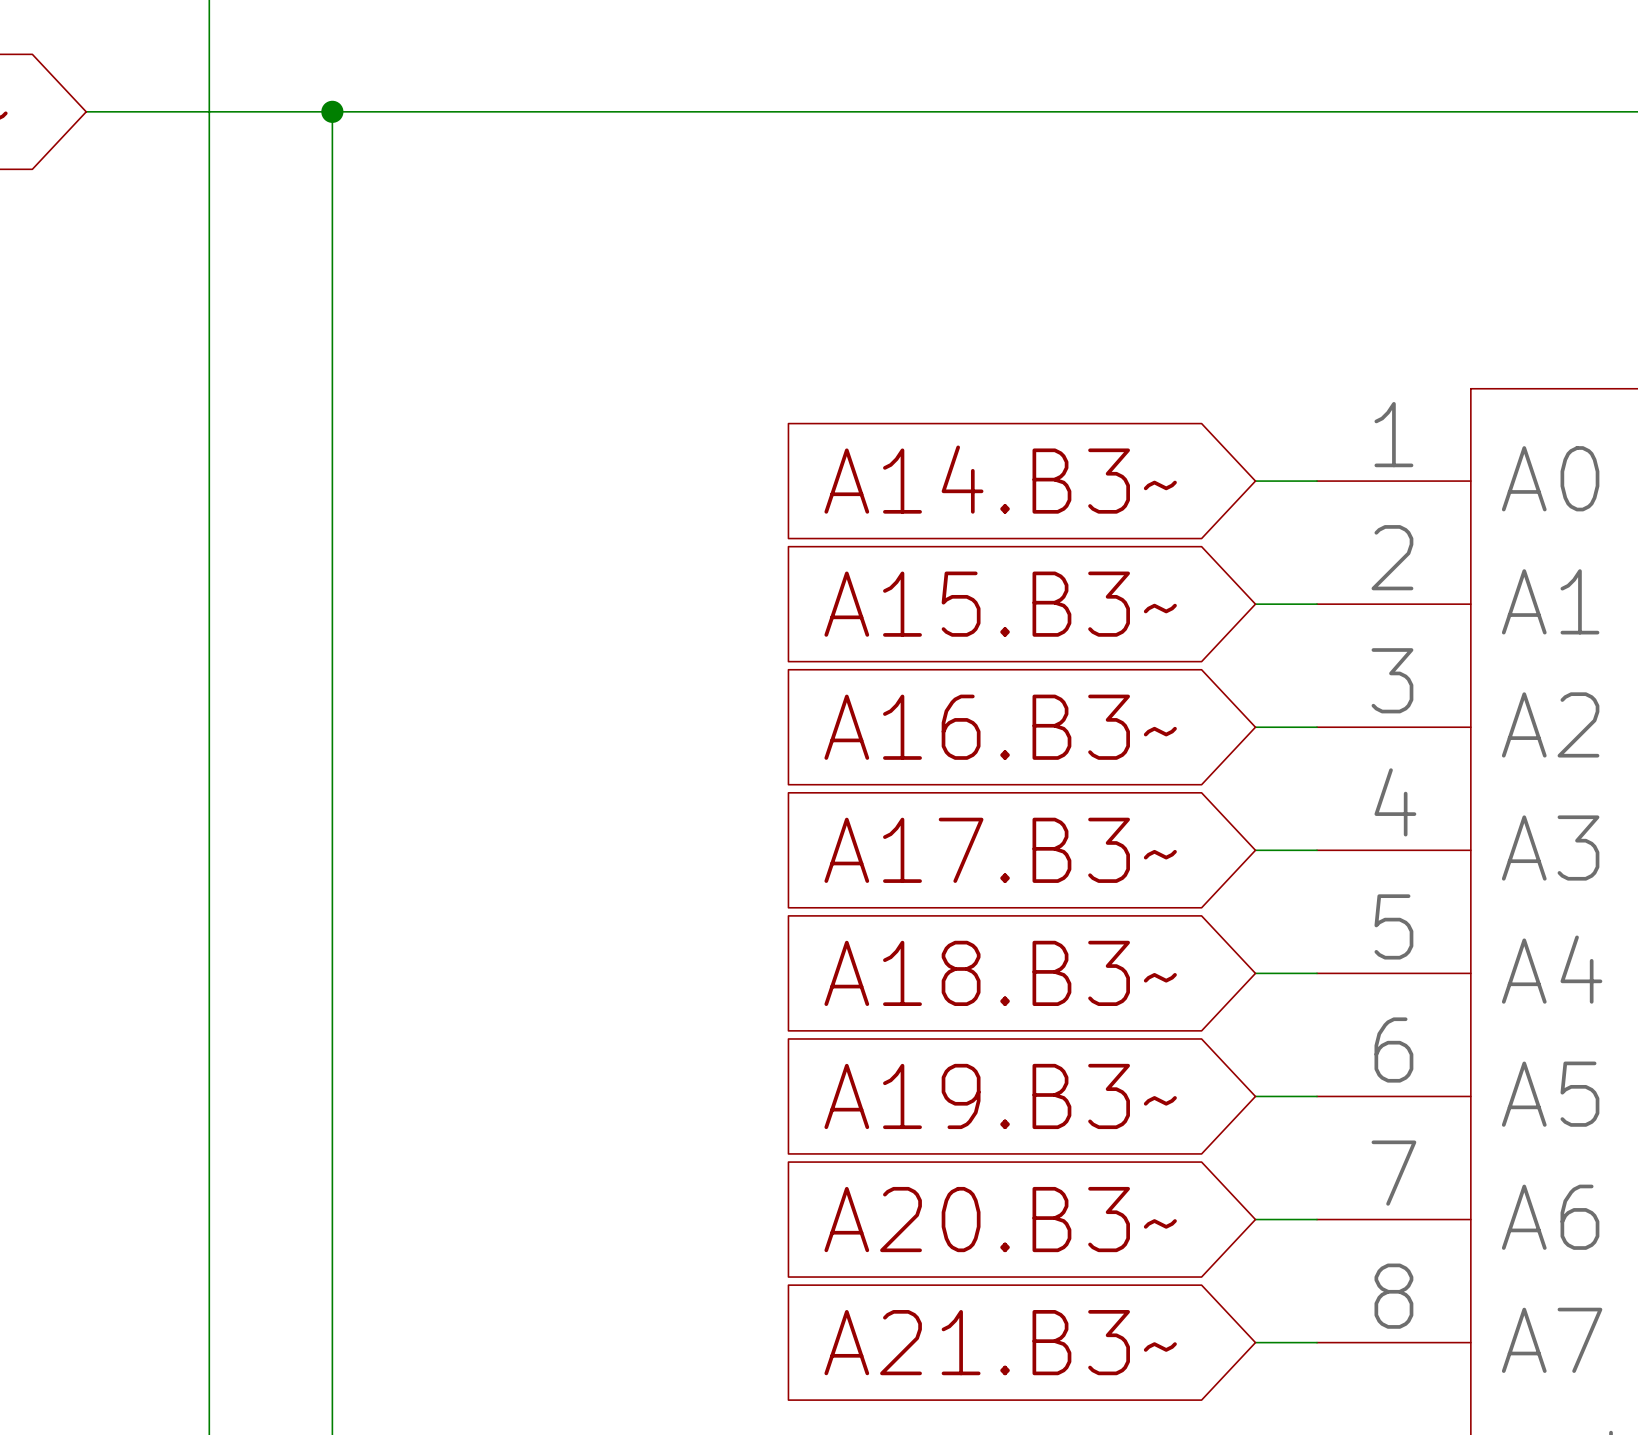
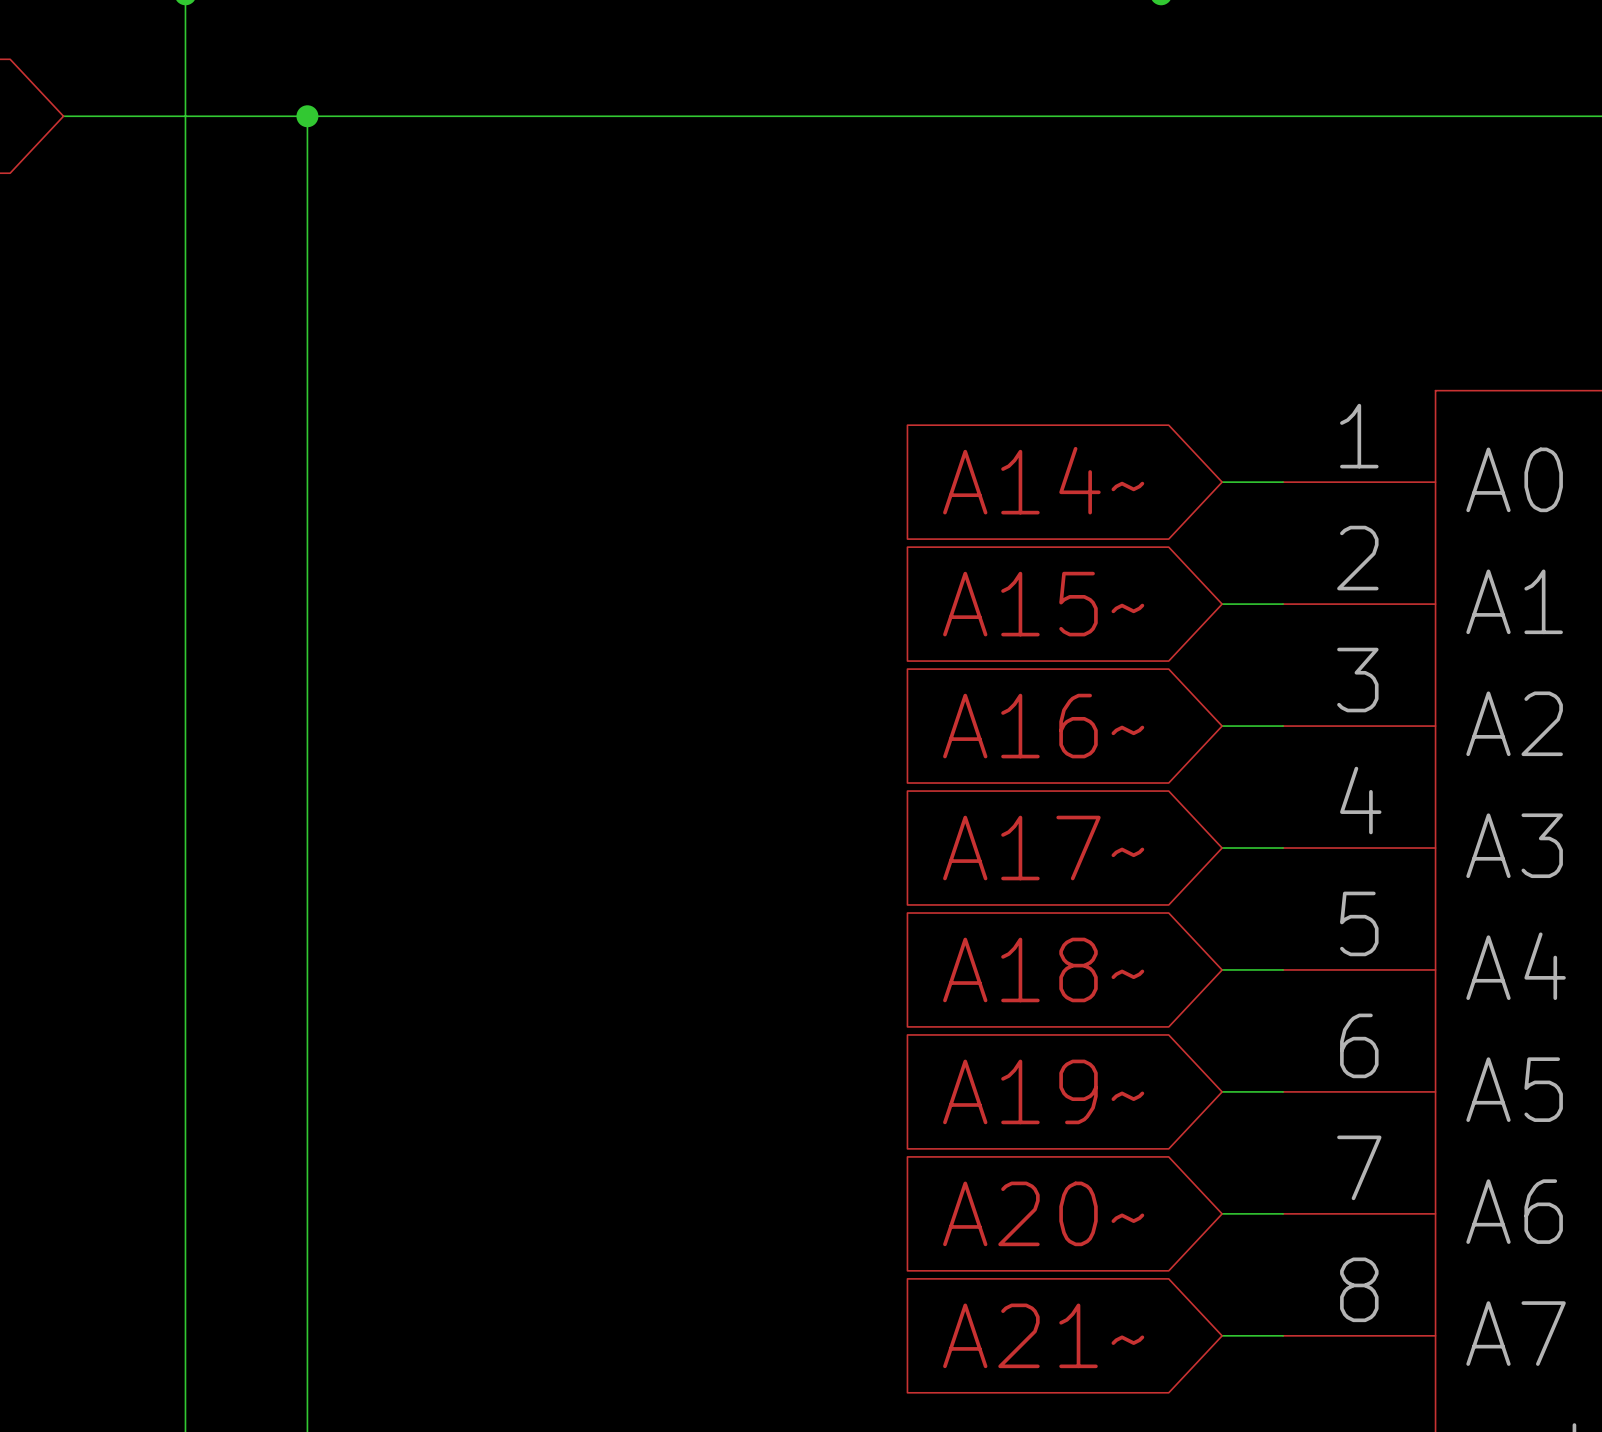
global label: A14.B3~ (1000, 479) -> A14~ (1043, 480)
global label: A15.B3~ (1000, 604) -> A15~ (1043, 604)
global label: A16.B3~ (1000, 727) -> A16~ (1043, 726)
global label: A17.B3~ (1000, 850) -> A17~ (1043, 848)
global label: A18.B3~ (1000, 973) -> A18~ (1043, 969)
global label: A19.B3~ (1000, 1096) -> A19~ (1043, 1091)
global label: A20.B3~ (1000, 1219) -> A20~ (1043, 1213)
global label: A21.B3~ (1000, 1342) -> A21~ (1043, 1335)

